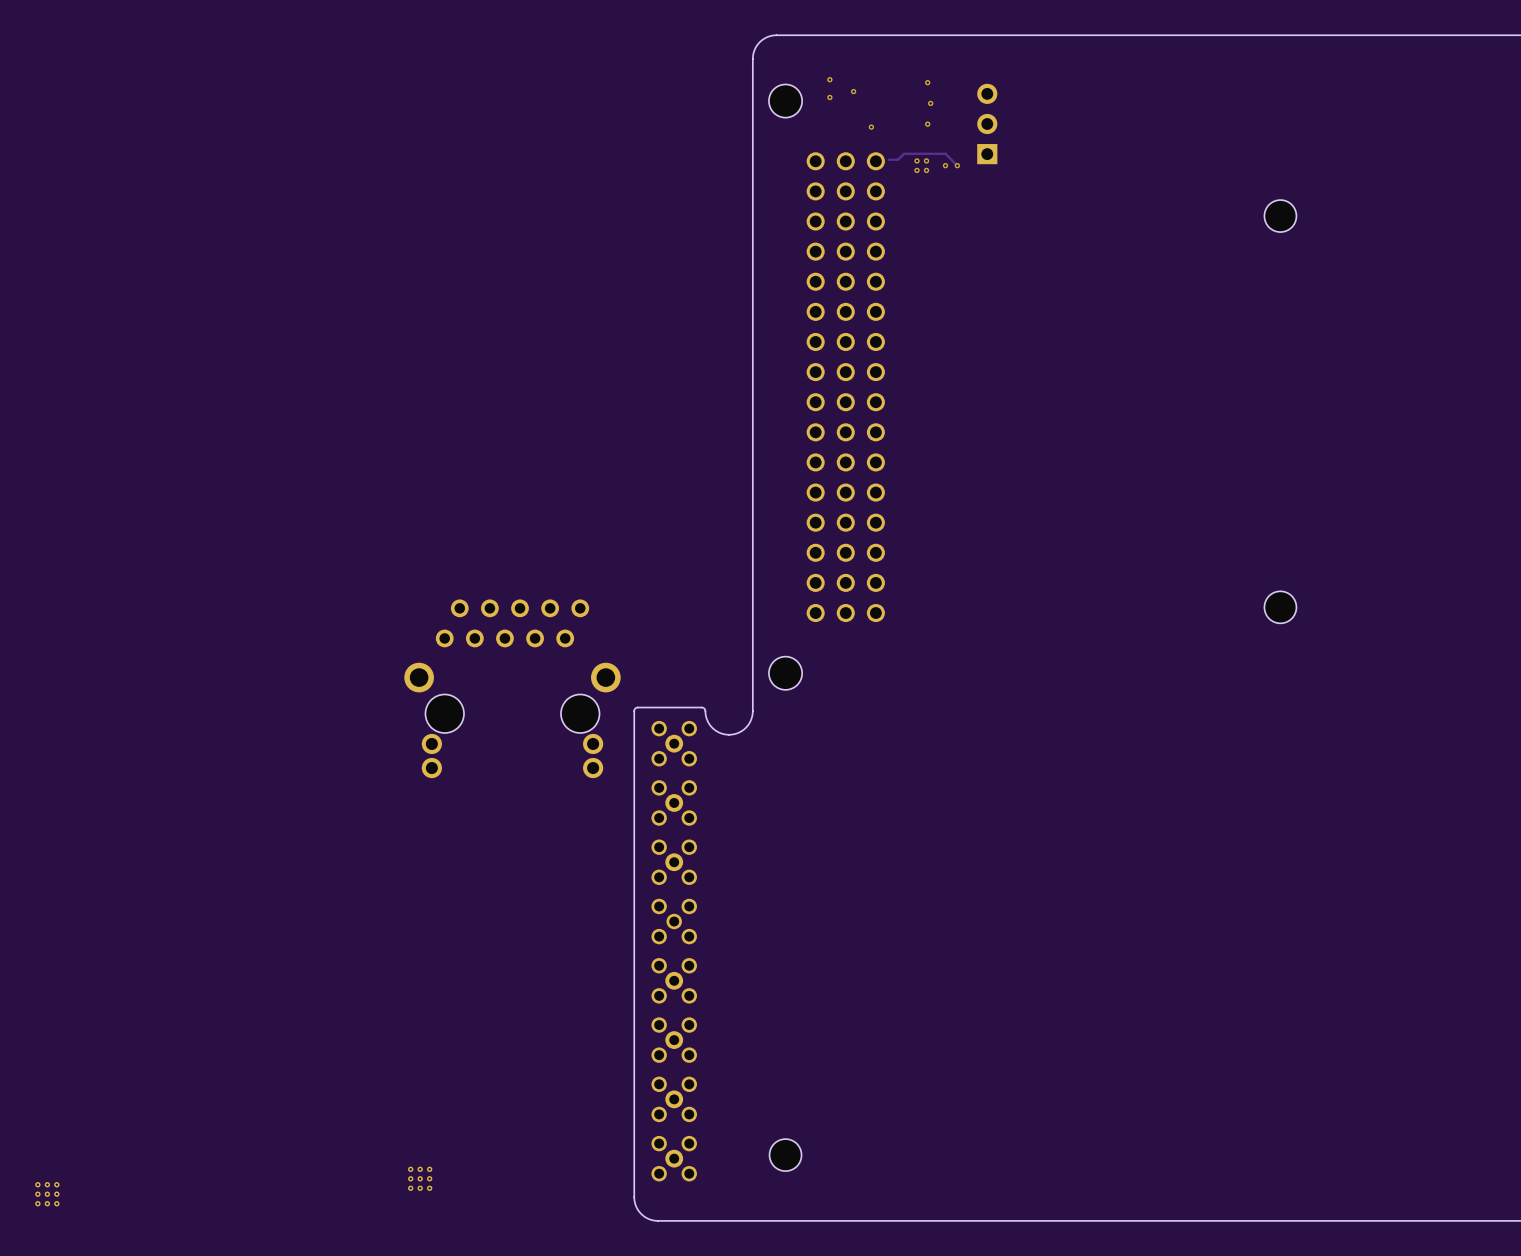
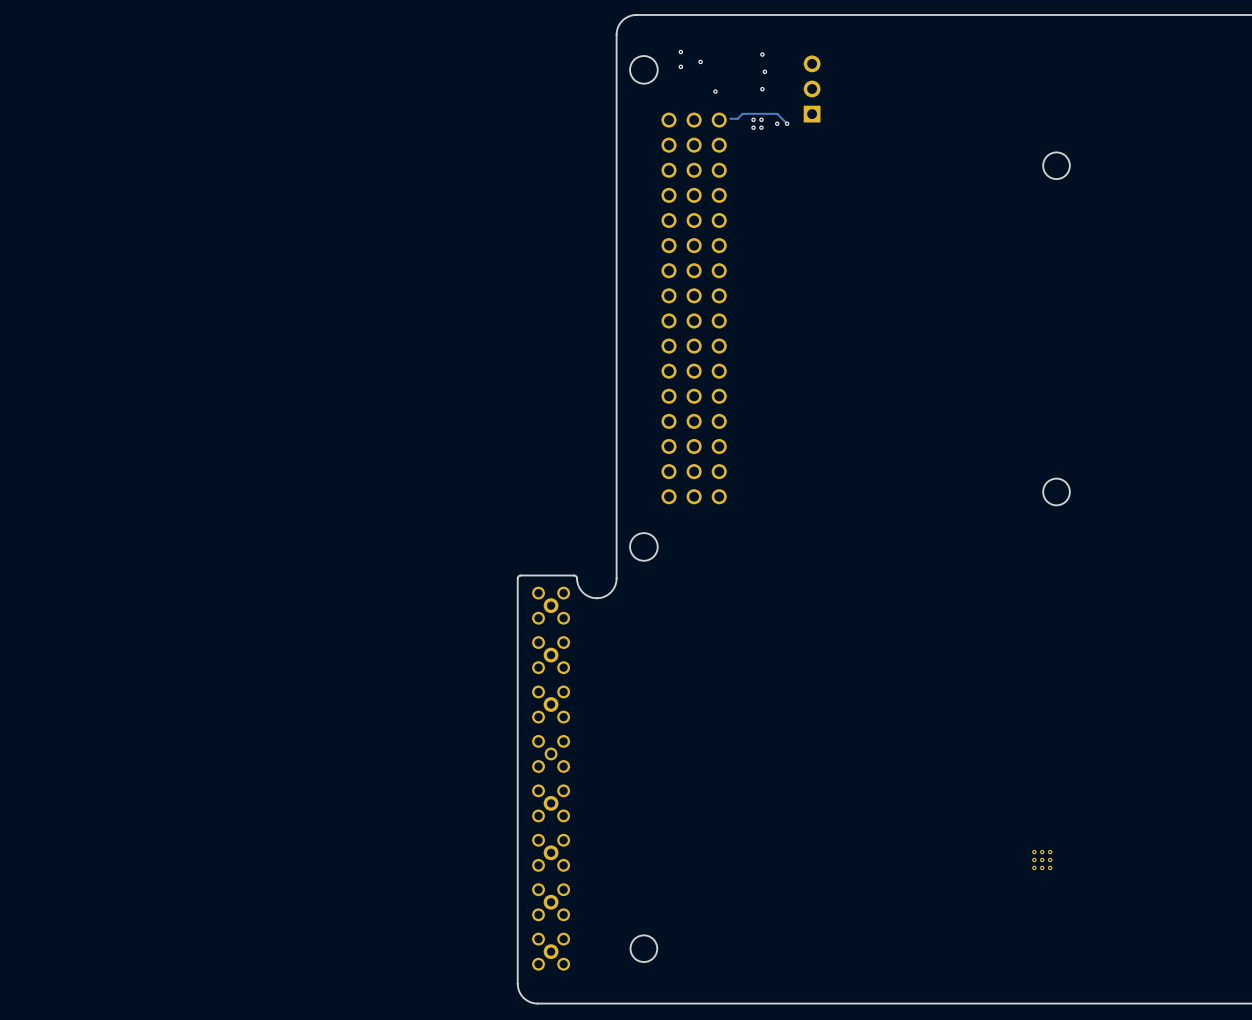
part: (512, 688) -> none
part: none -> (1042, 860)
part: (420, 1178) -> none
part: (47, 1194) -> none

